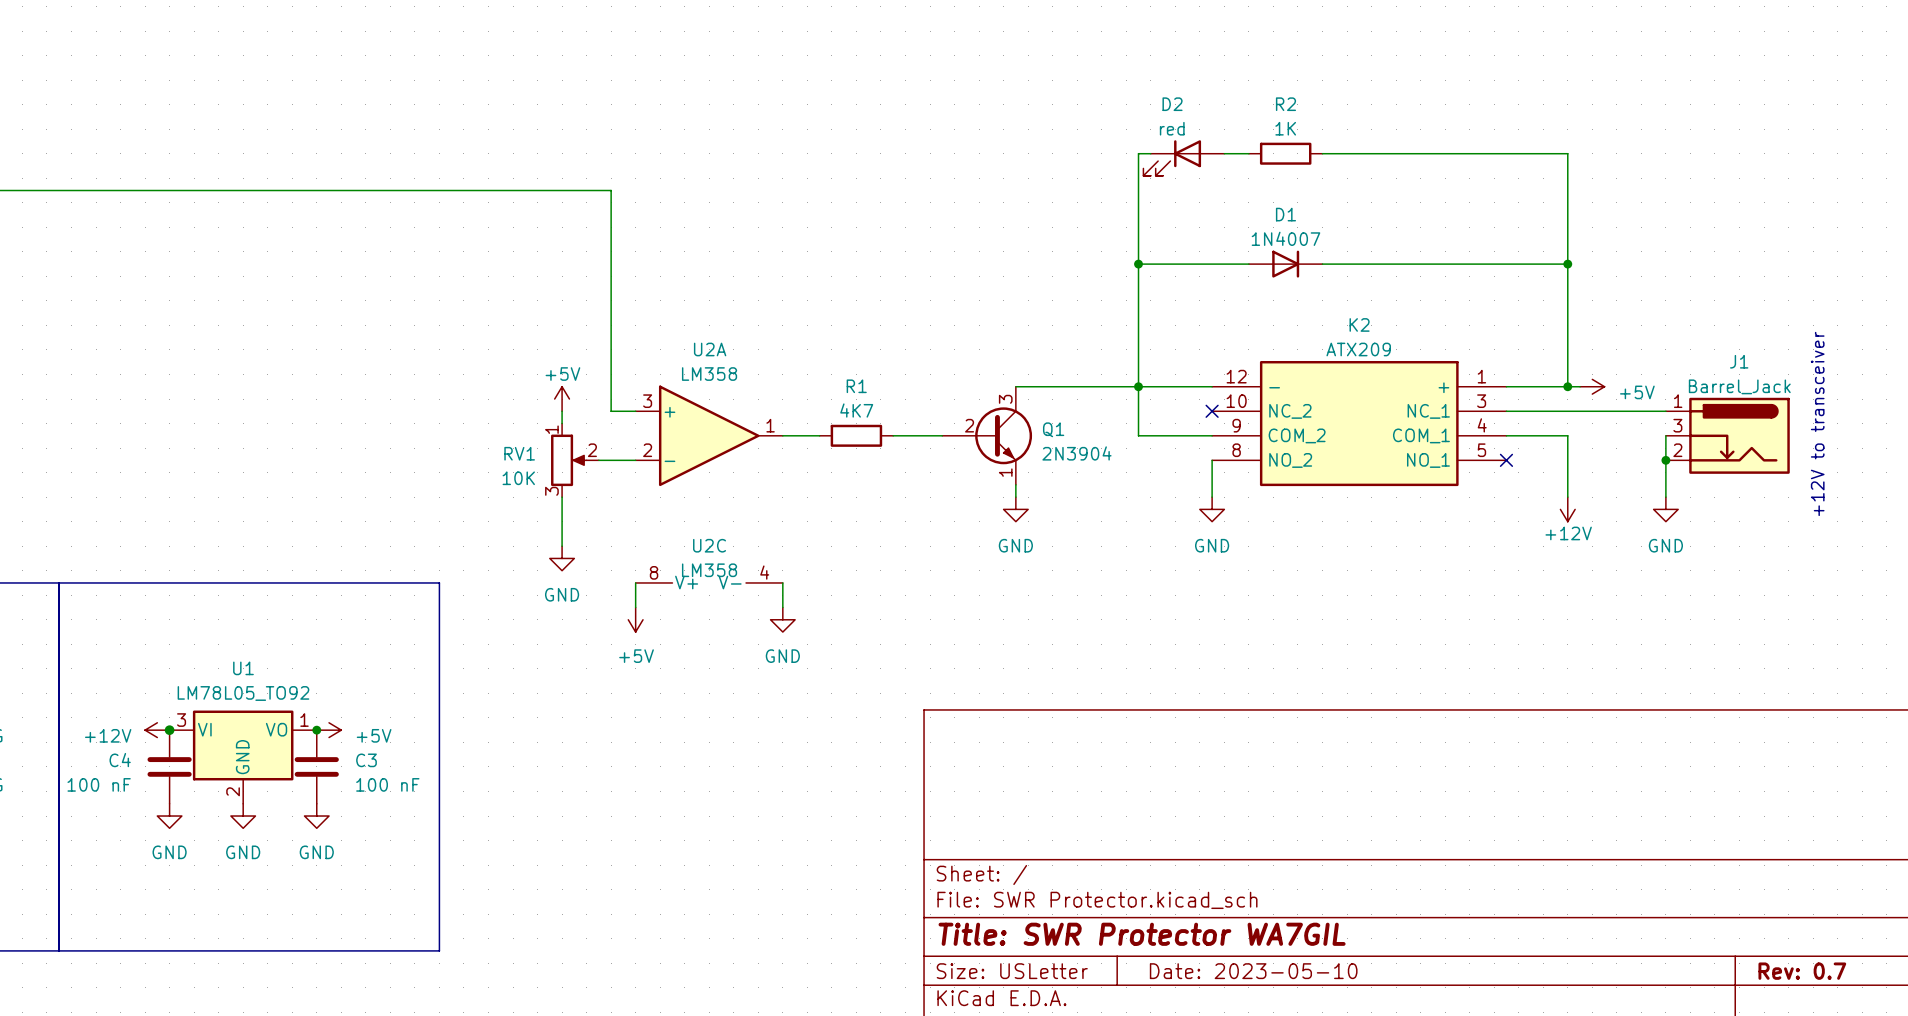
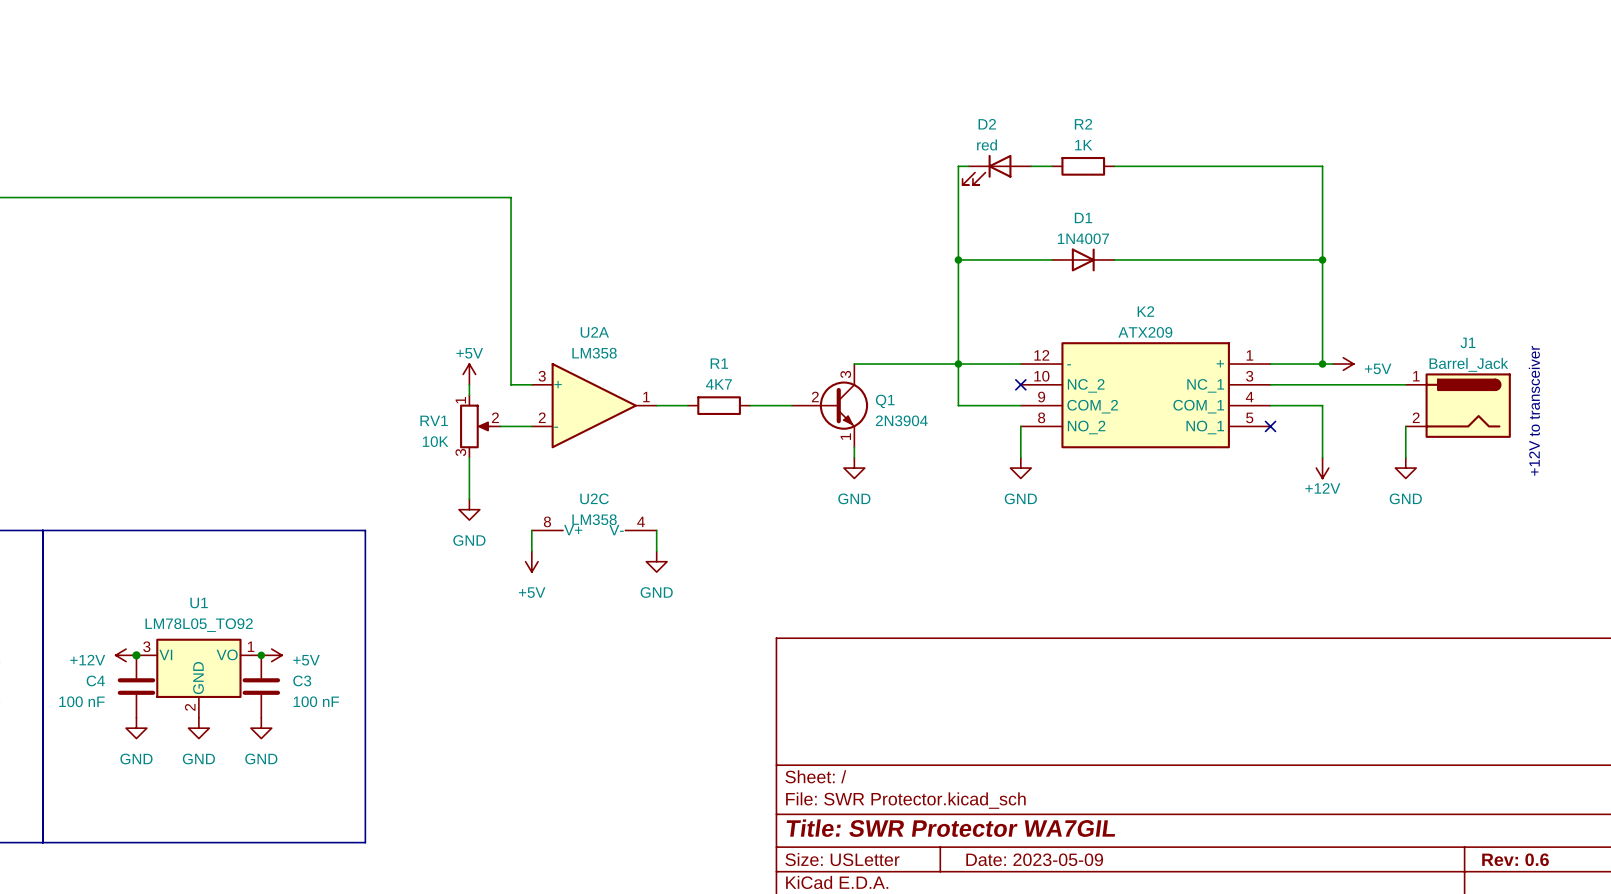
J1 symbol: [1665, 397, 1790, 474] -> [1405, 373, 1511, 438]
wire: (1665, 435) (1665, 460) -> none
junction: (1665, 460) -> none
title block: Date: 2023-05-10 (1253, 971) -> Date: 2023-05-09 (1034, 859)
title block: Rev: 0.7 (1802, 971) -> Rev: 0.6 (1515, 859)

